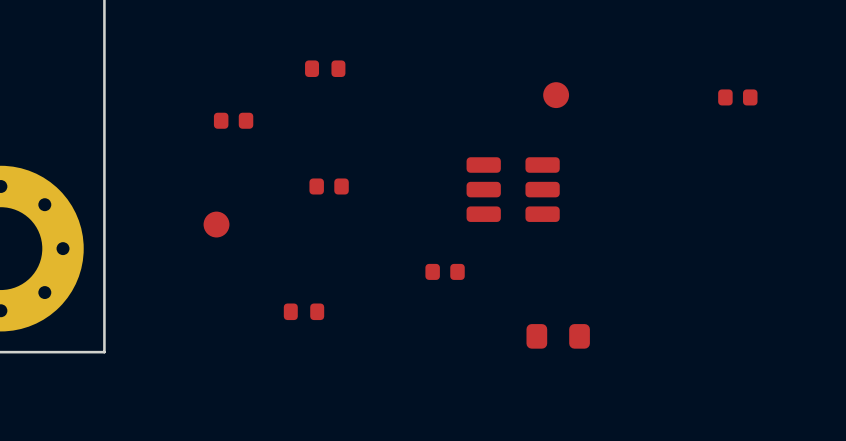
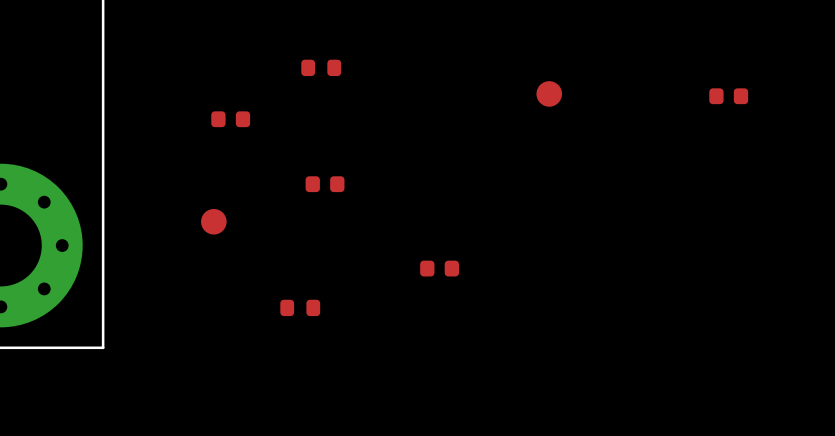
part: (513, 189) -> none
part: (558, 336) -> none

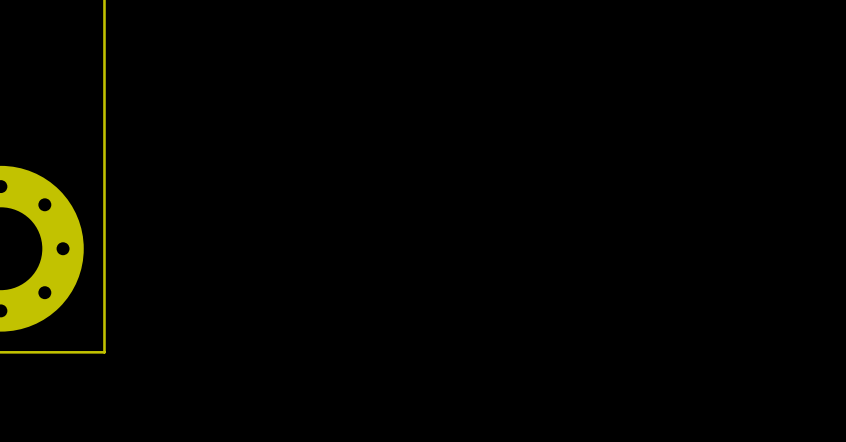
part: (321, 67) -> none
part: (549, 93) -> none
part: (728, 96) -> none
part: (230, 119) -> none
part: (325, 184) -> none
part: (213, 221) -> none
part: (439, 268) -> none
part: (300, 307) -> none

